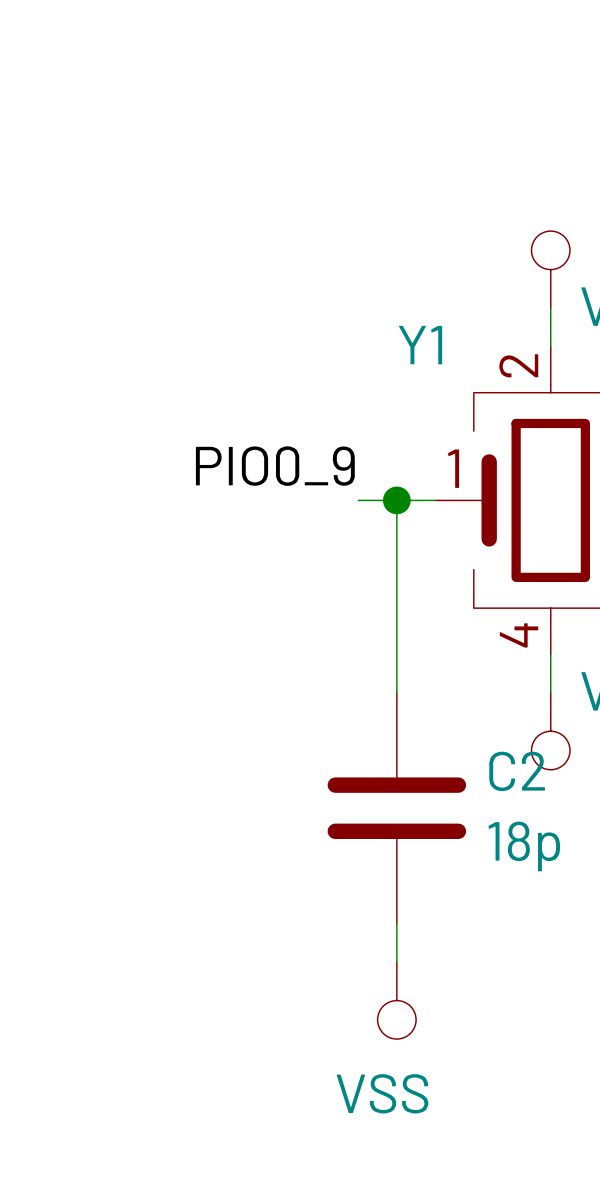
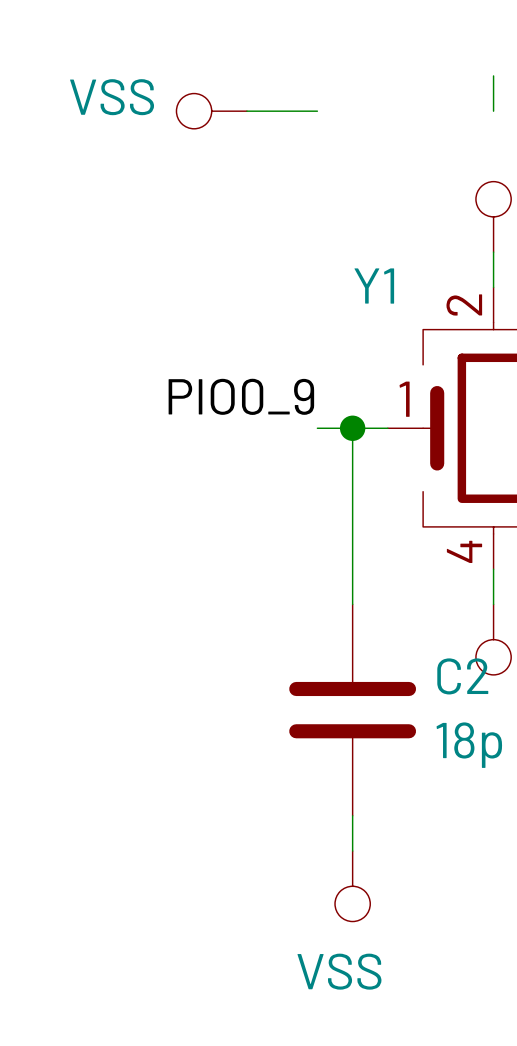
wire: none -> (493, 75) (493, 111)
power symbol: none -> VSS (211, 111)
wire: none -> (246, 111) (317, 111)

